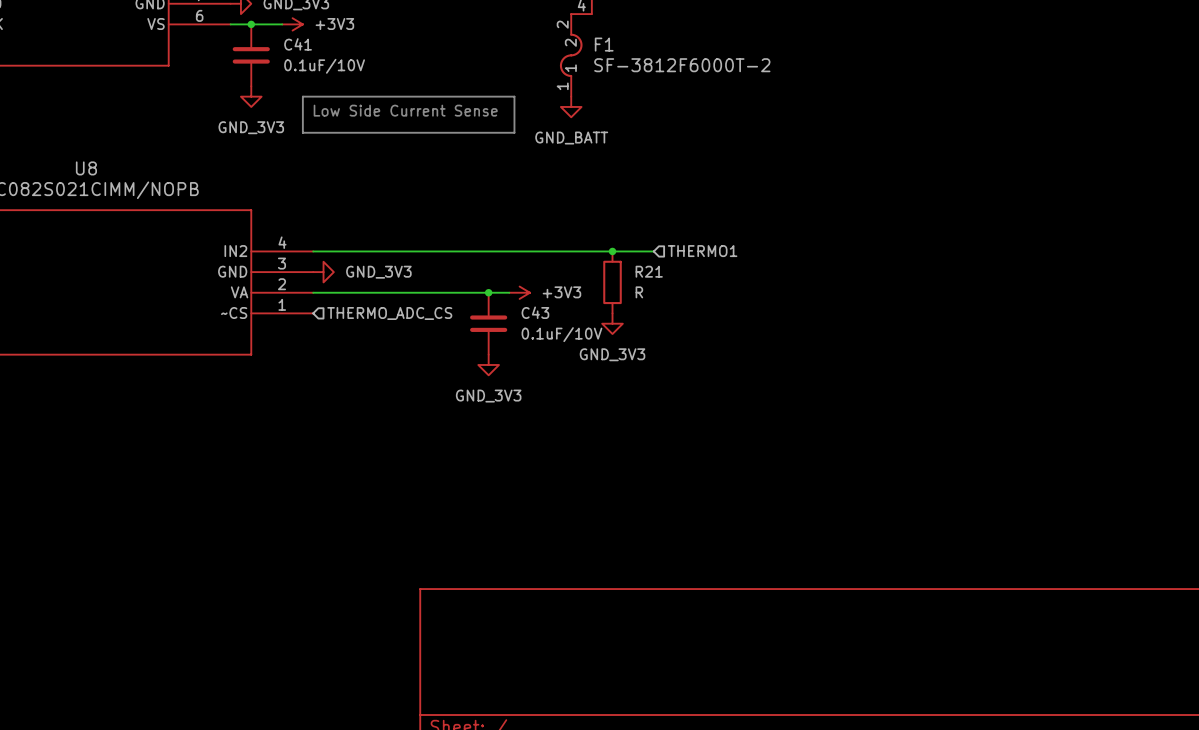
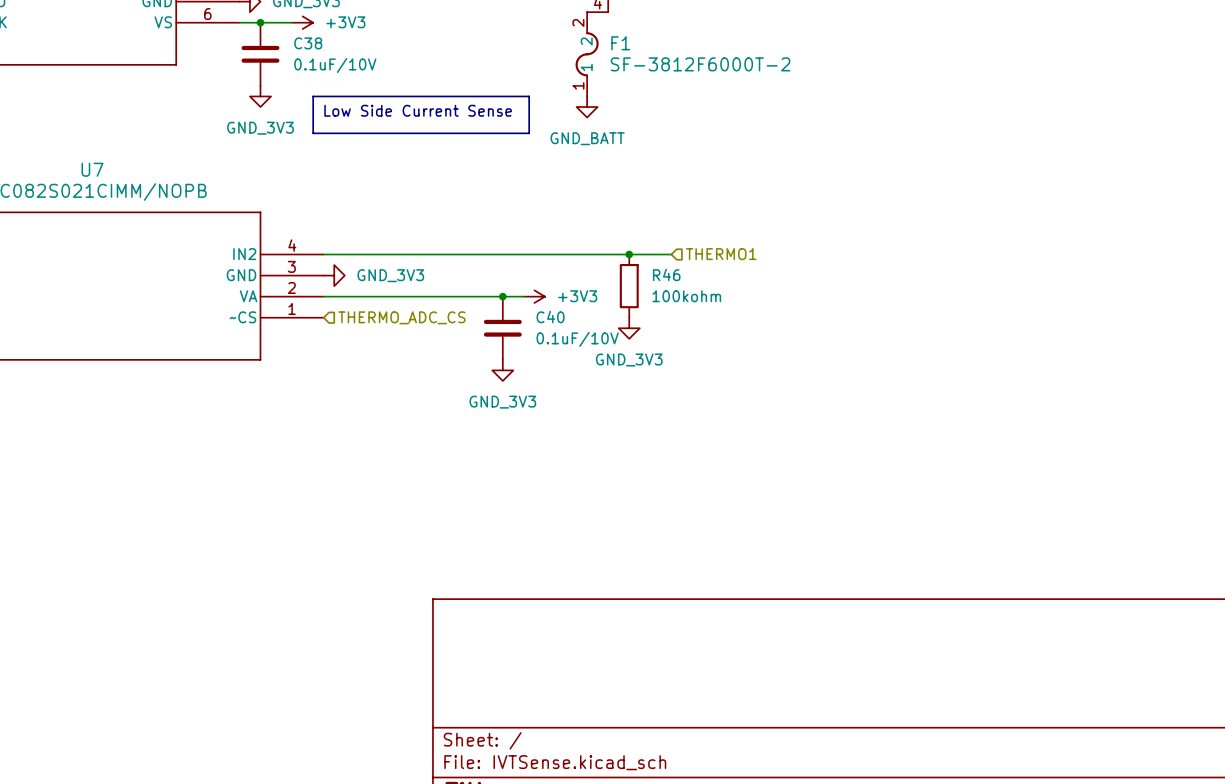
C41 name: C41 (298, 44) -> C38 (308, 43)
U8 name: U8 (86, 168) -> U7 (92, 169)
R21 name: R21 (649, 271) -> R46 (666, 274)
R21 value: R (639, 292) -> 100kohm (686, 296)
C43 name: C43 (535, 312) -> C40 (550, 317)

